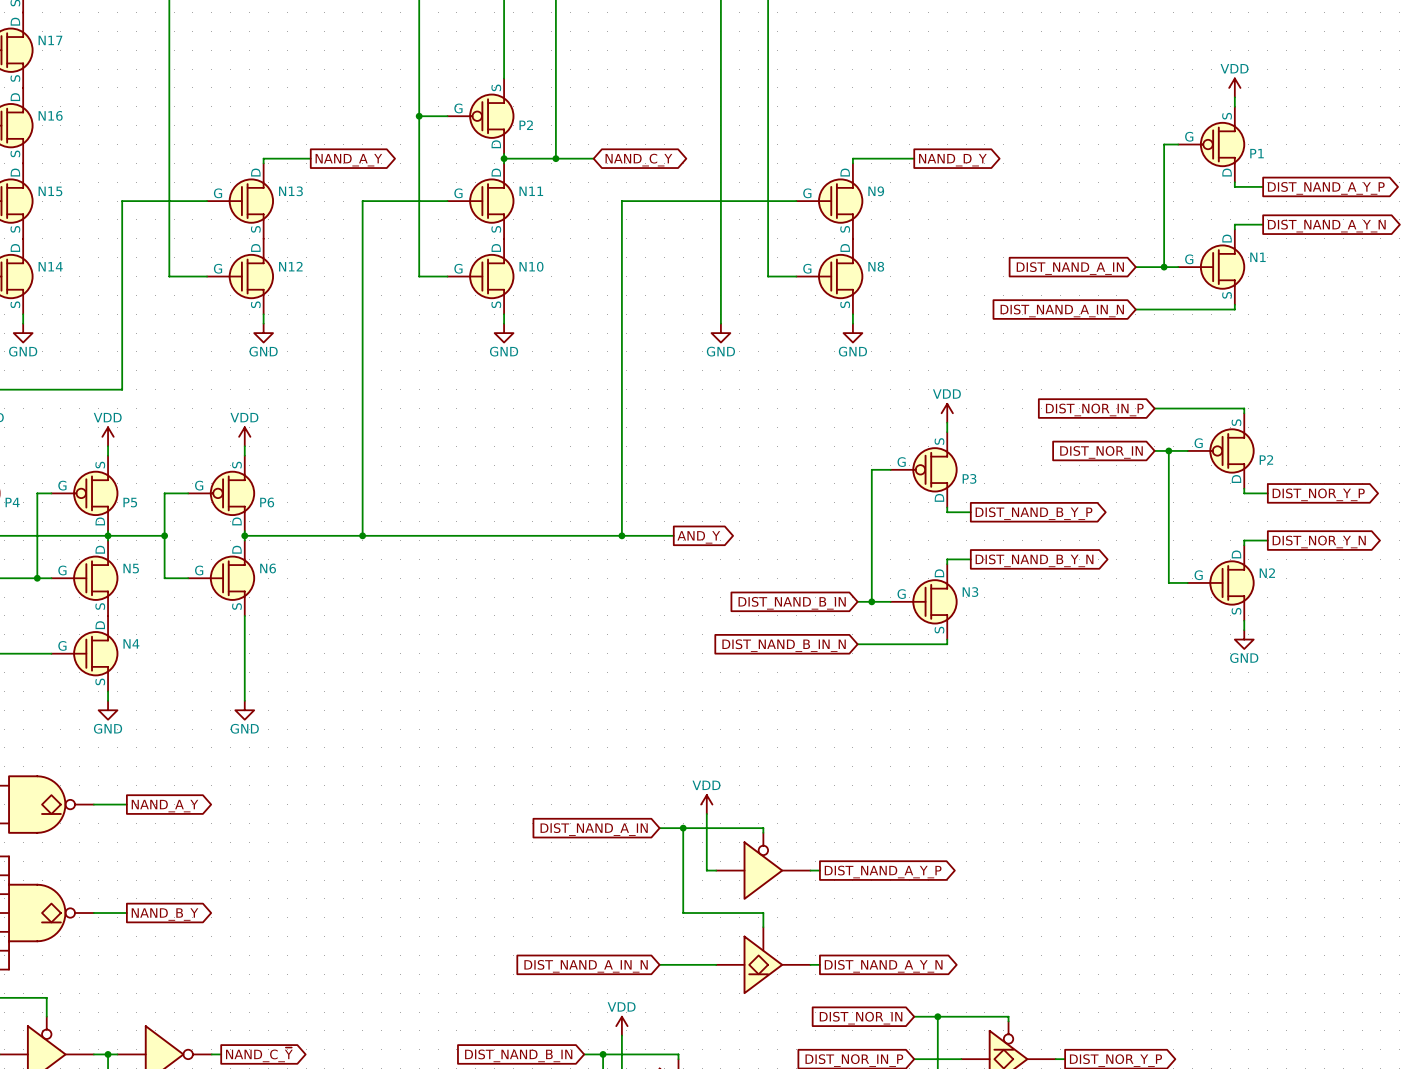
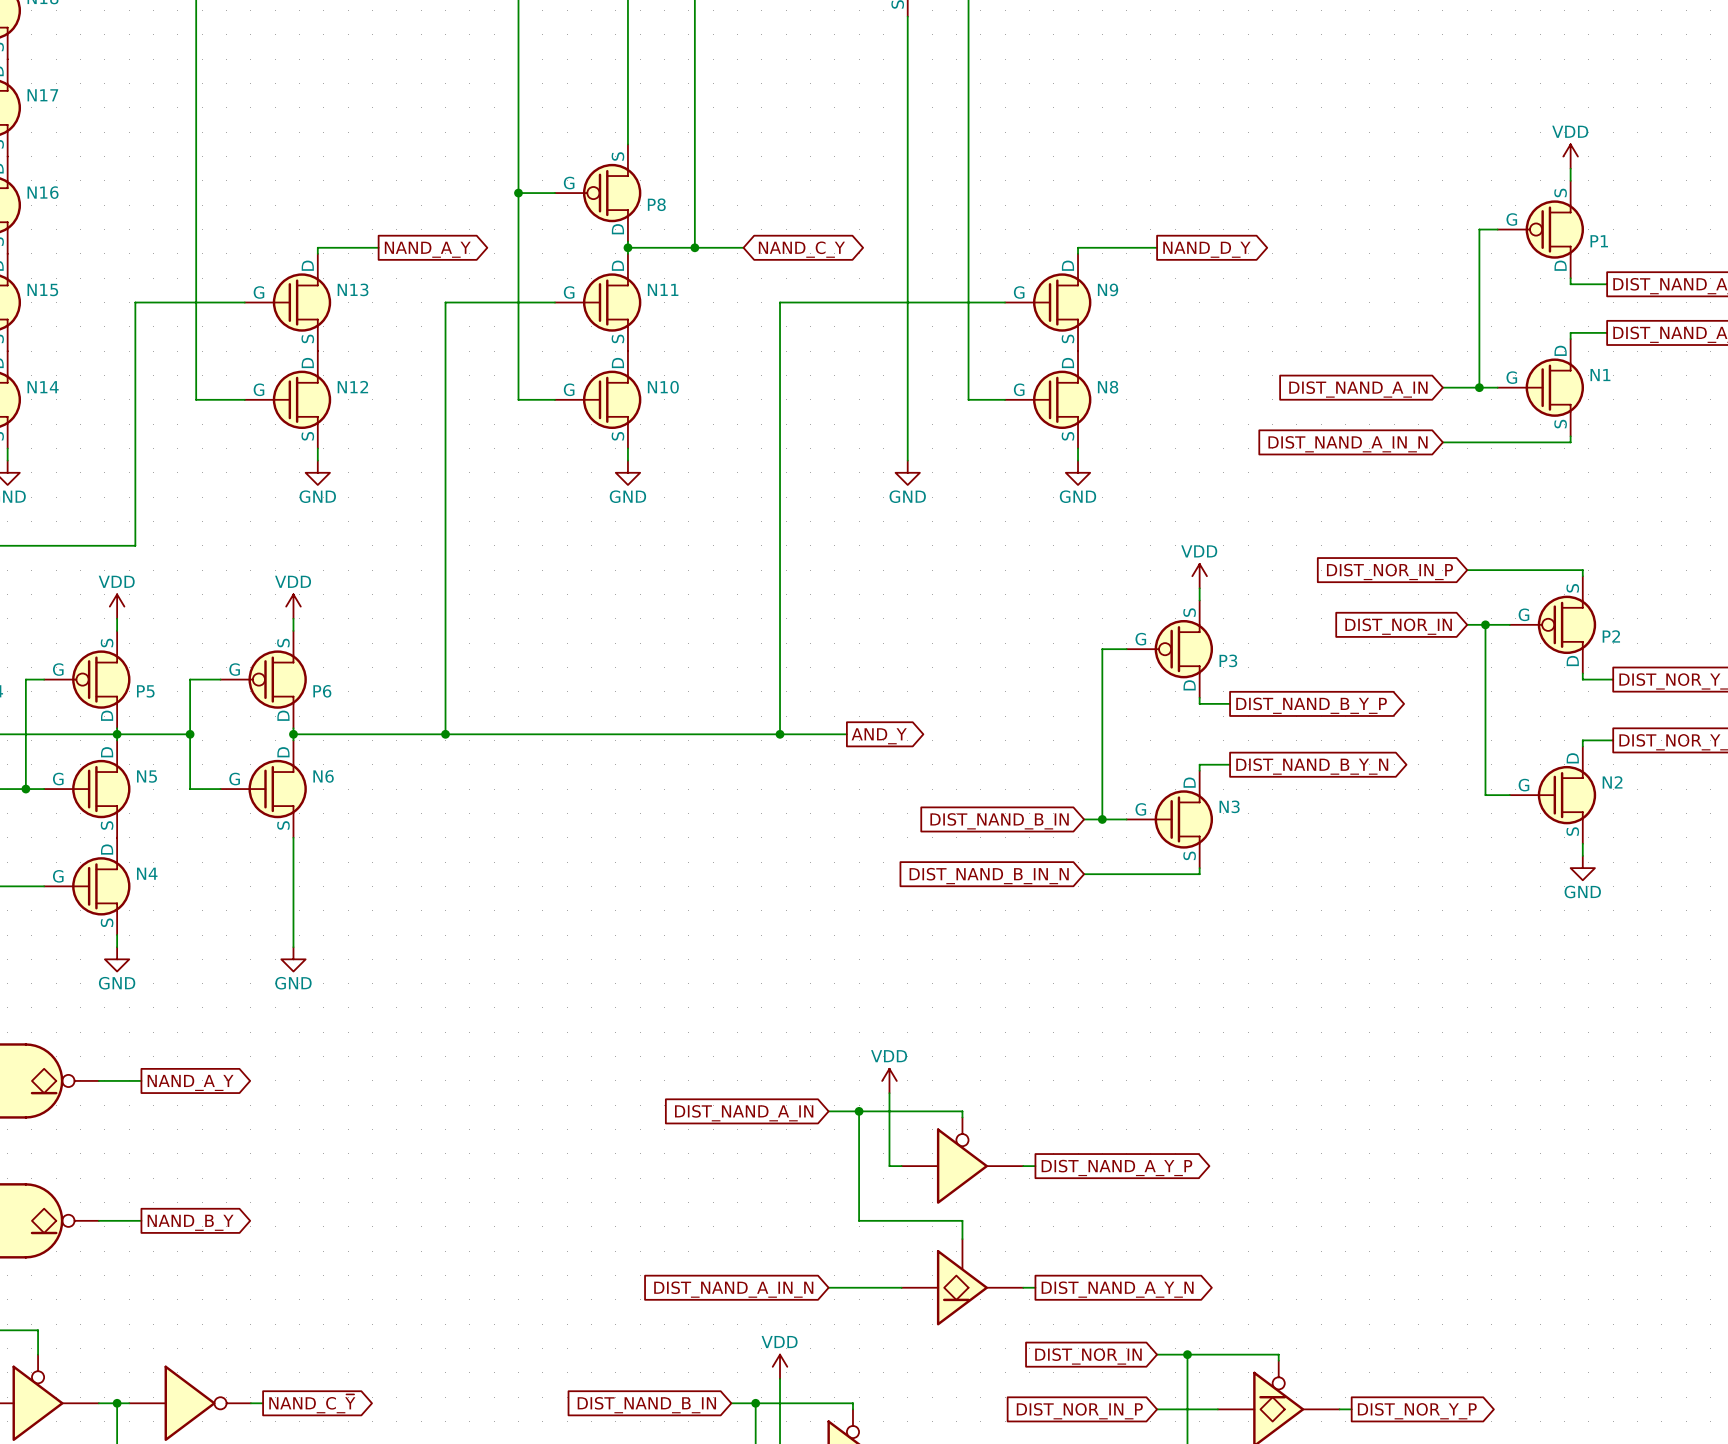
P2 name: P2 (526, 125) -> P8 (656, 204)

